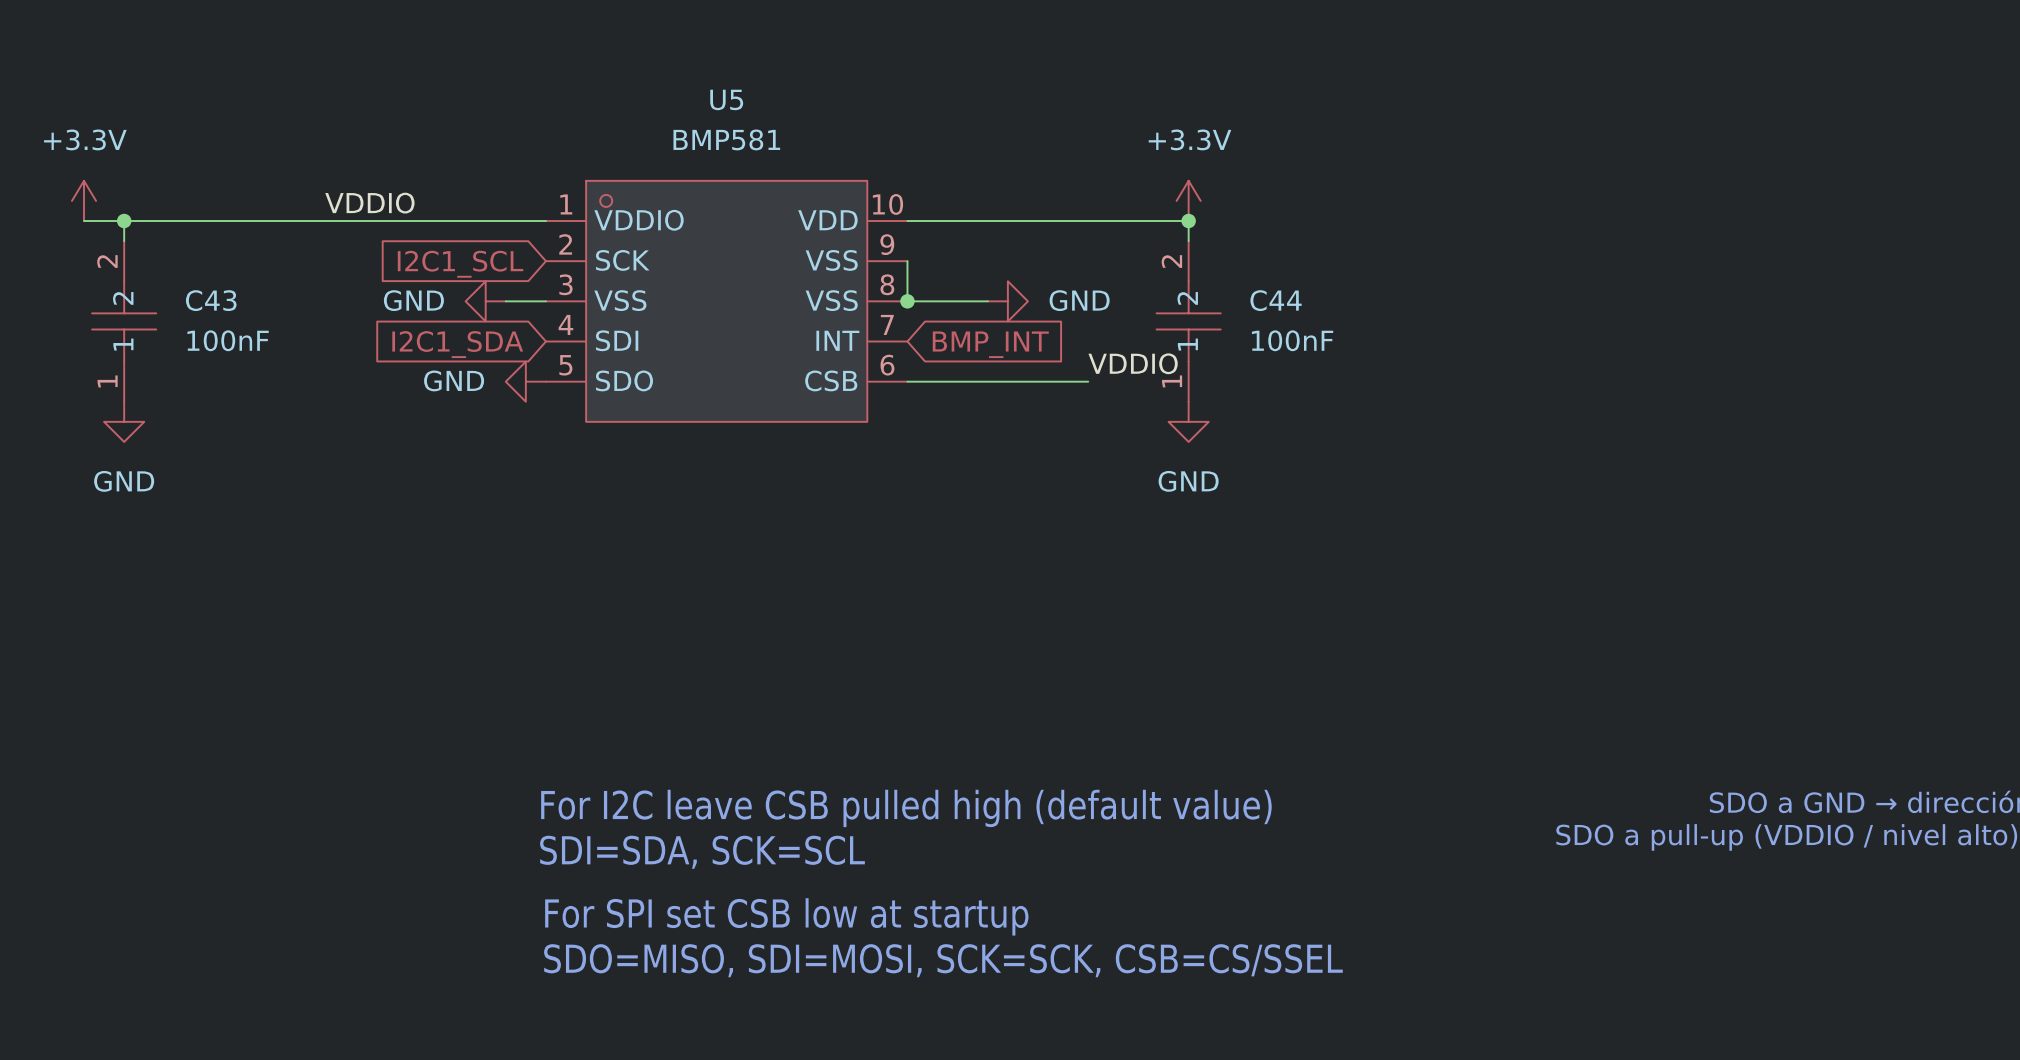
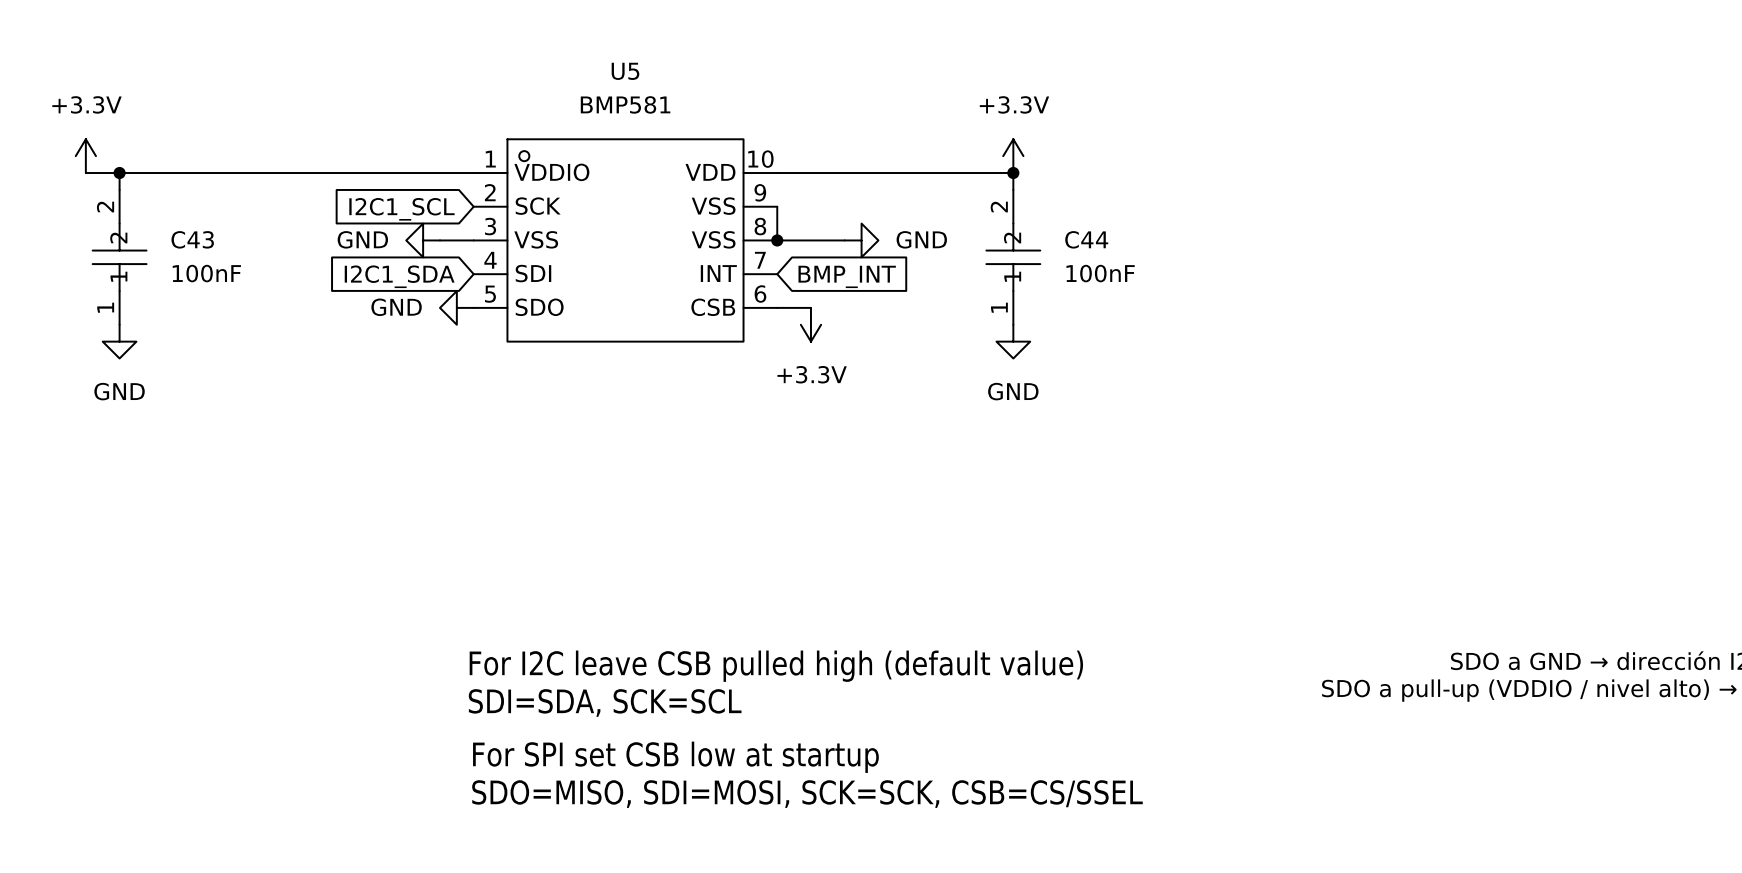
label: VDDIO (369, 203) -> none
label: VDDIO (1133, 363) -> none
wire: (947, 381) (1088, 381) -> none
power symbol: none -> +3.3V (810, 324)

